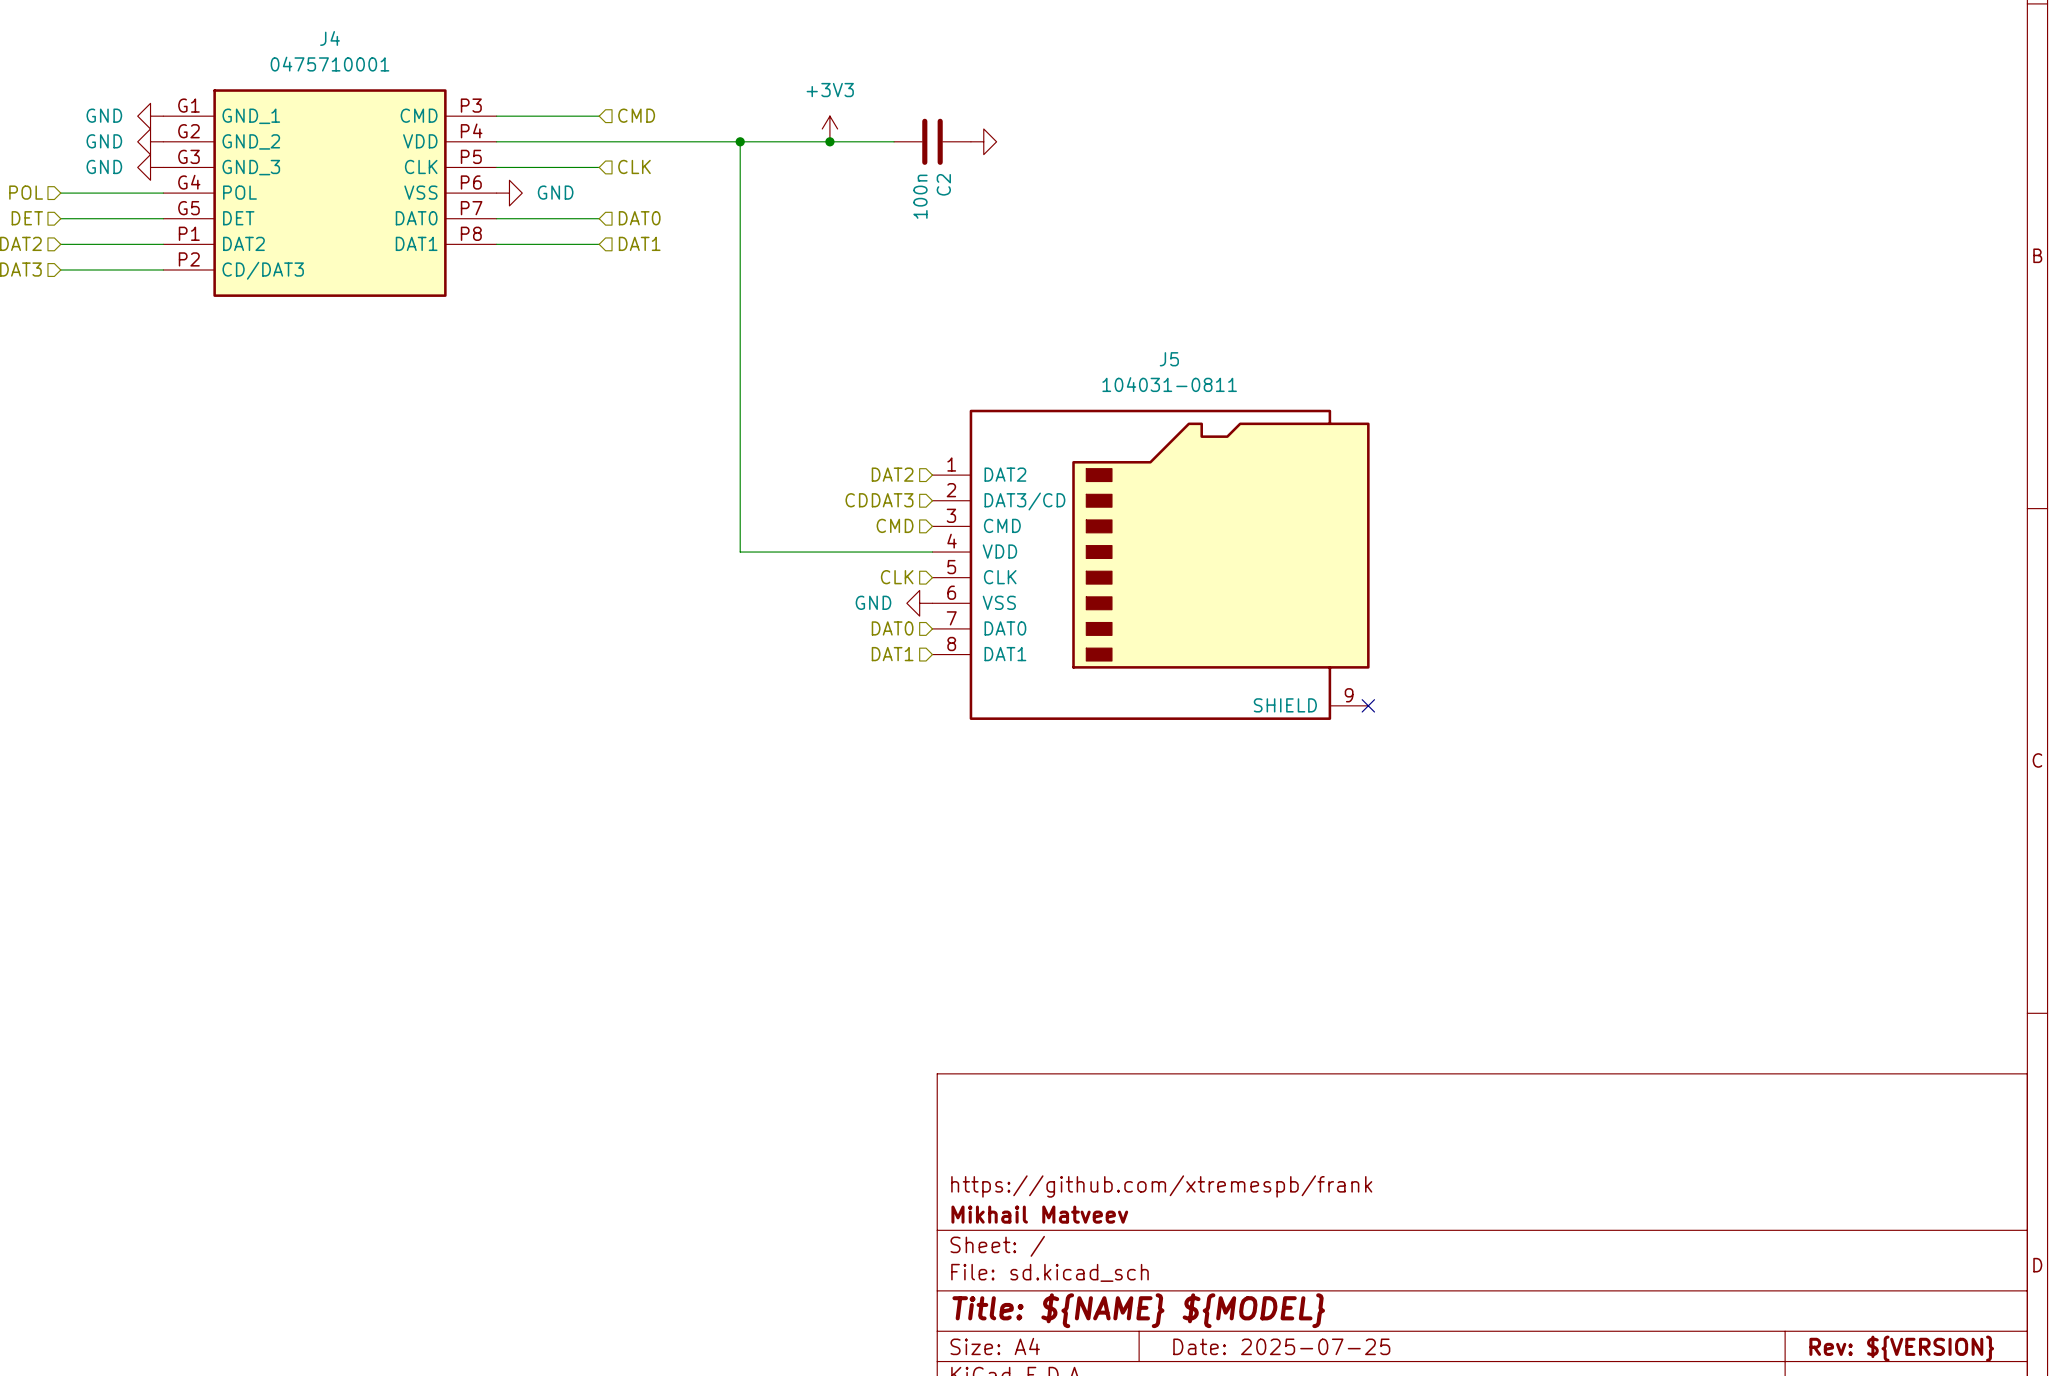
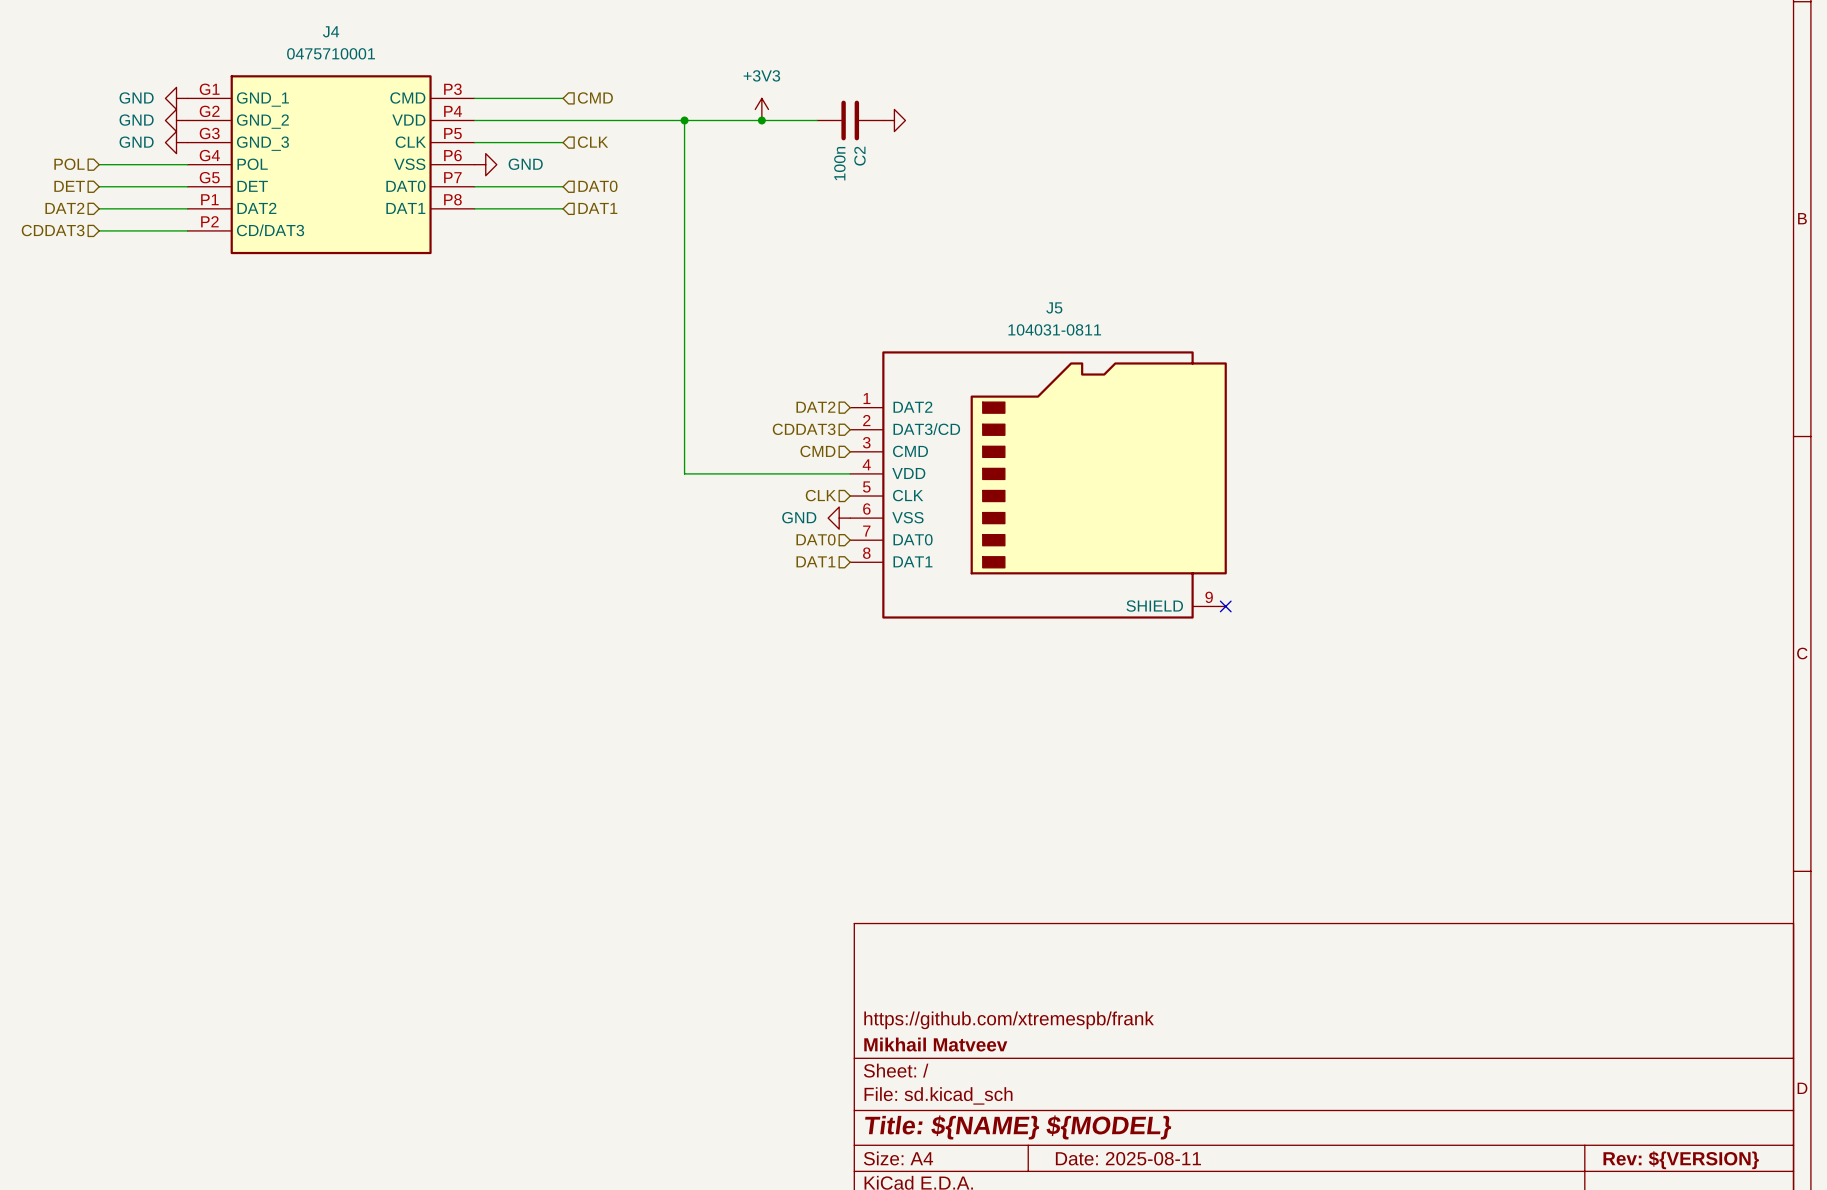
title block: Date: 2025-07-25 (1281, 1346) -> Date: 2025-08-11 (1128, 1158)

